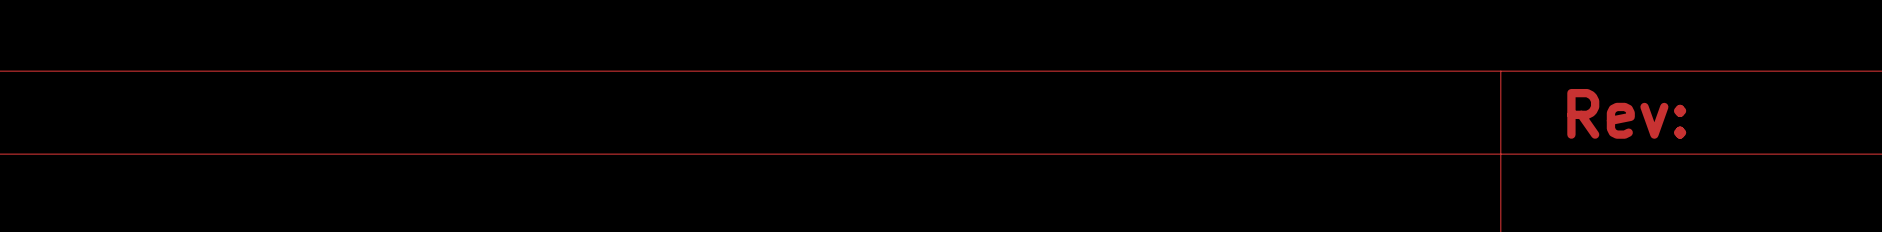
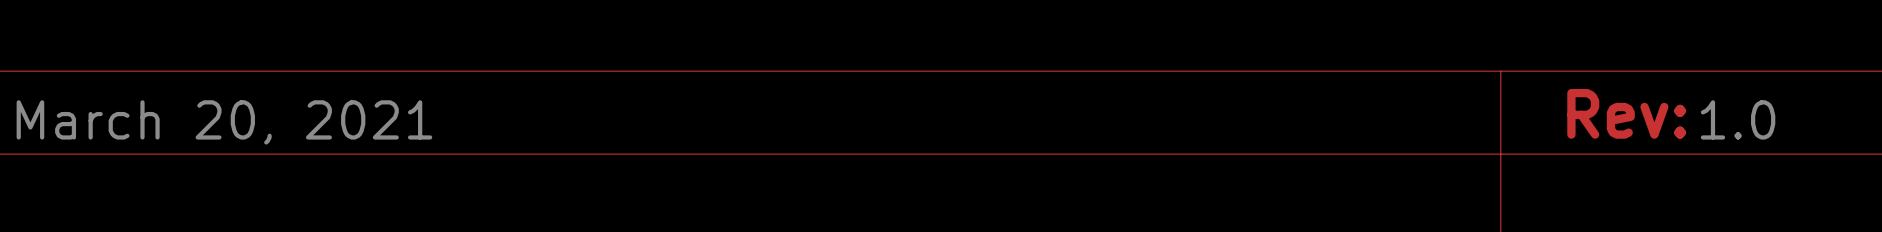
text: none -> 1.0 (1738, 119)
text: none -> March 20, 2021 (224, 122)

